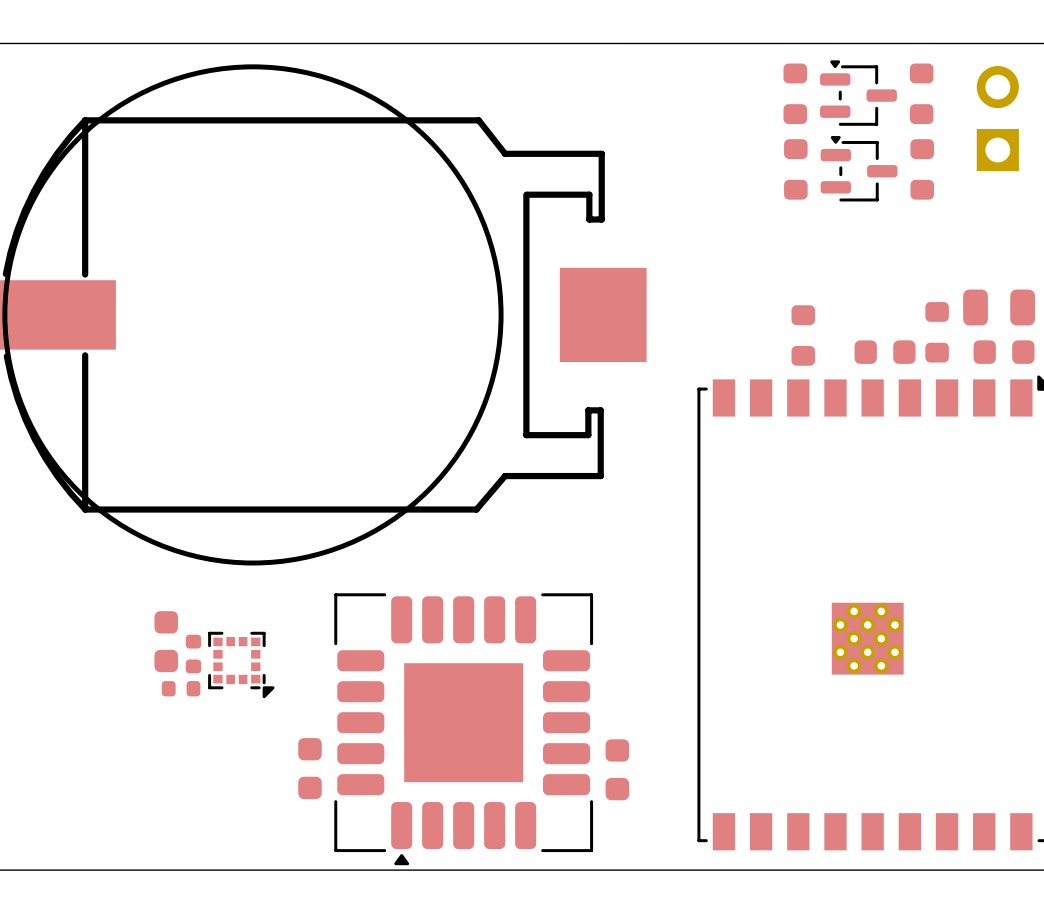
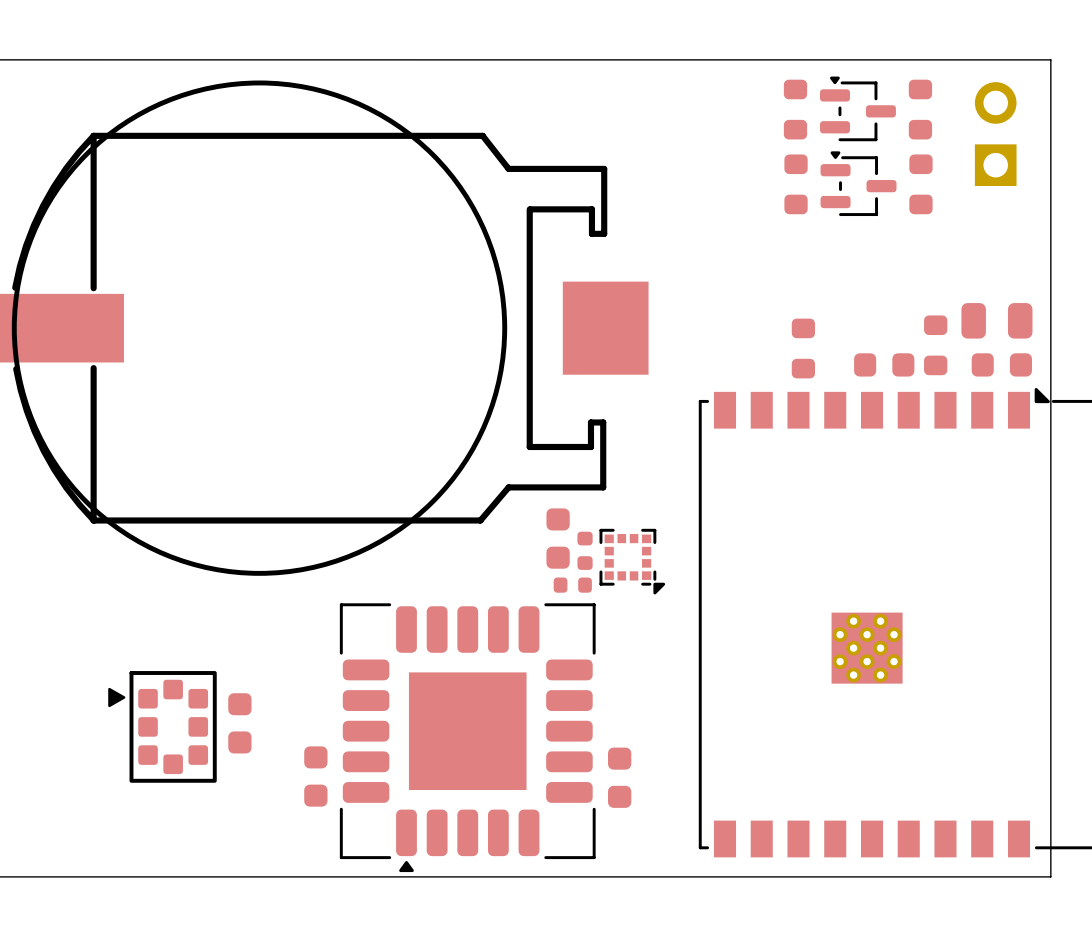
part: none -> (558, 538)
part: none -> (585, 550)
part: none -> (572, 585)
part position: (166, 641) -> (239, 723)
part: (193, 654) -> none
part position: (241, 664) -> (632, 561)
part: (181, 688) -> none
part: none -> (162, 726)

